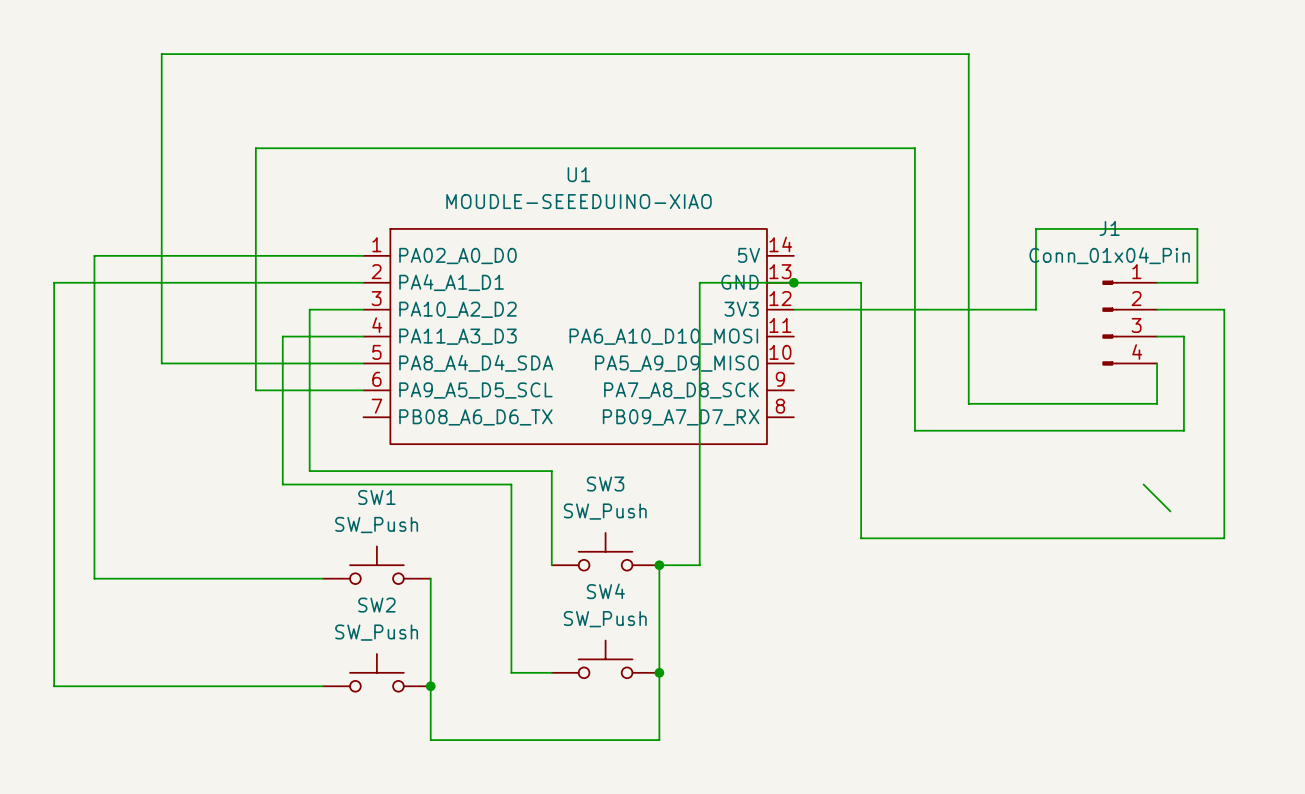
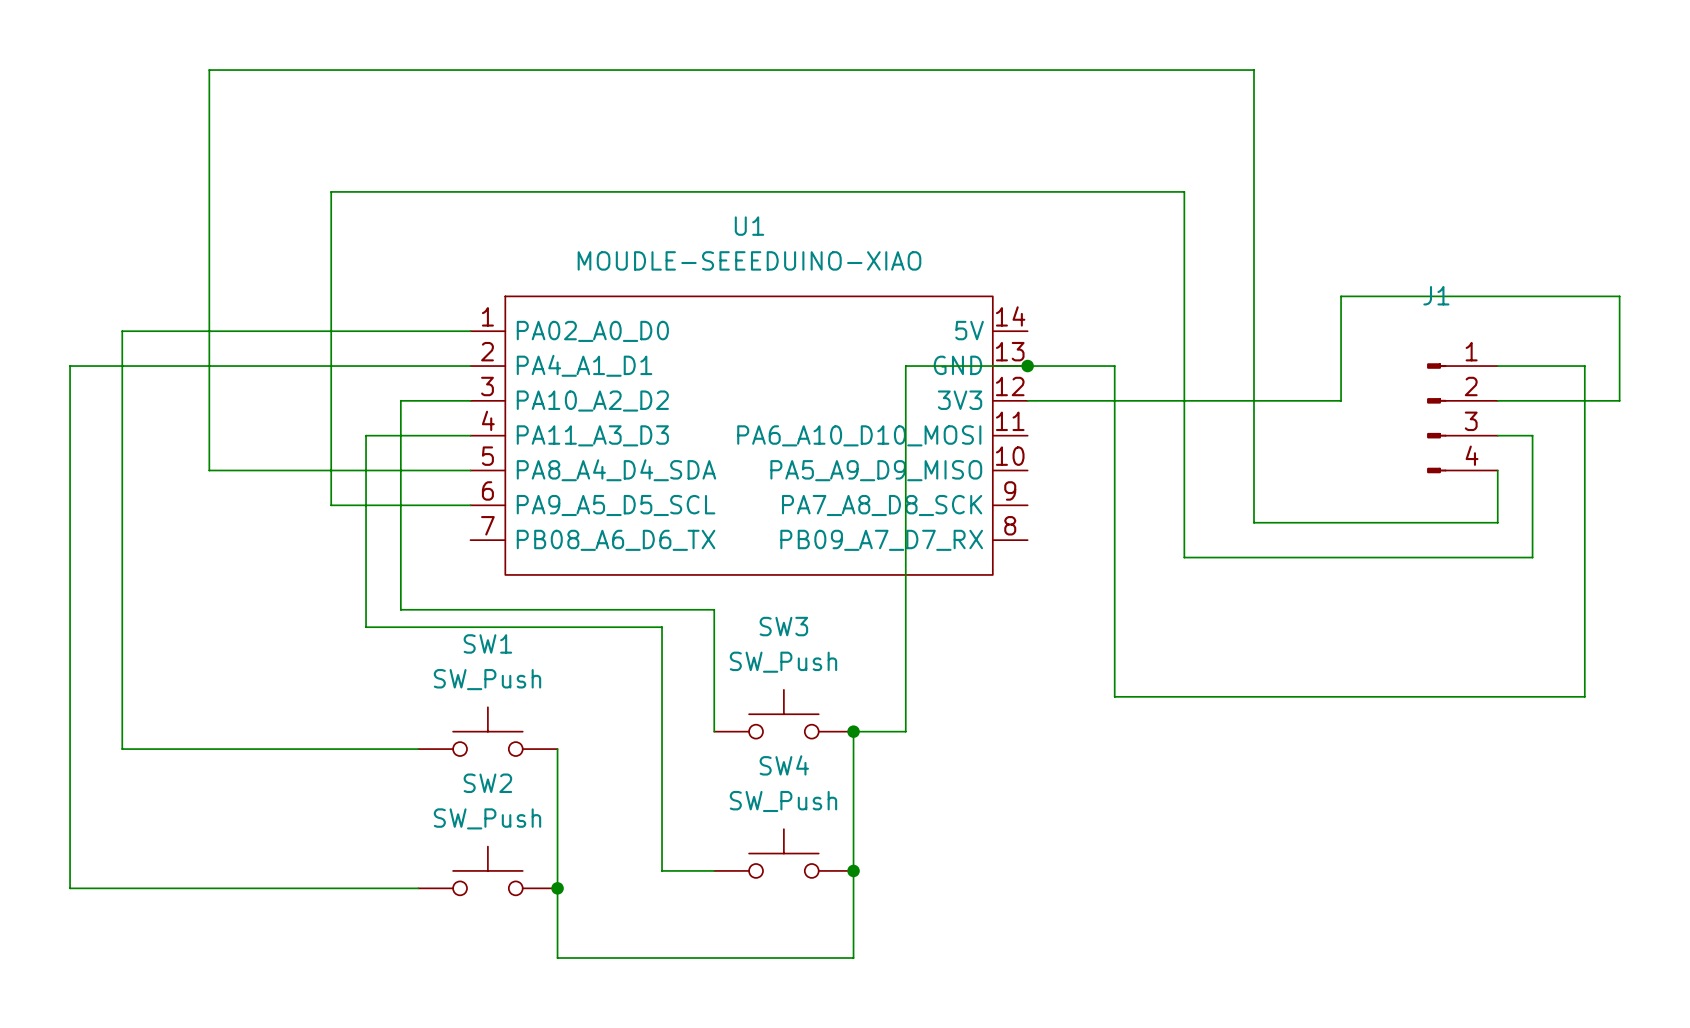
wire: (1197, 228) (1197, 282) -> (1549, 296) (1619, 296) (1619, 400) (1584, 400) (1584, 366) (1549, 366)
J1 value: Conn_01x04_Pin (1109, 255) -> none
wire: (1143, 484) (1170, 511) -> none

